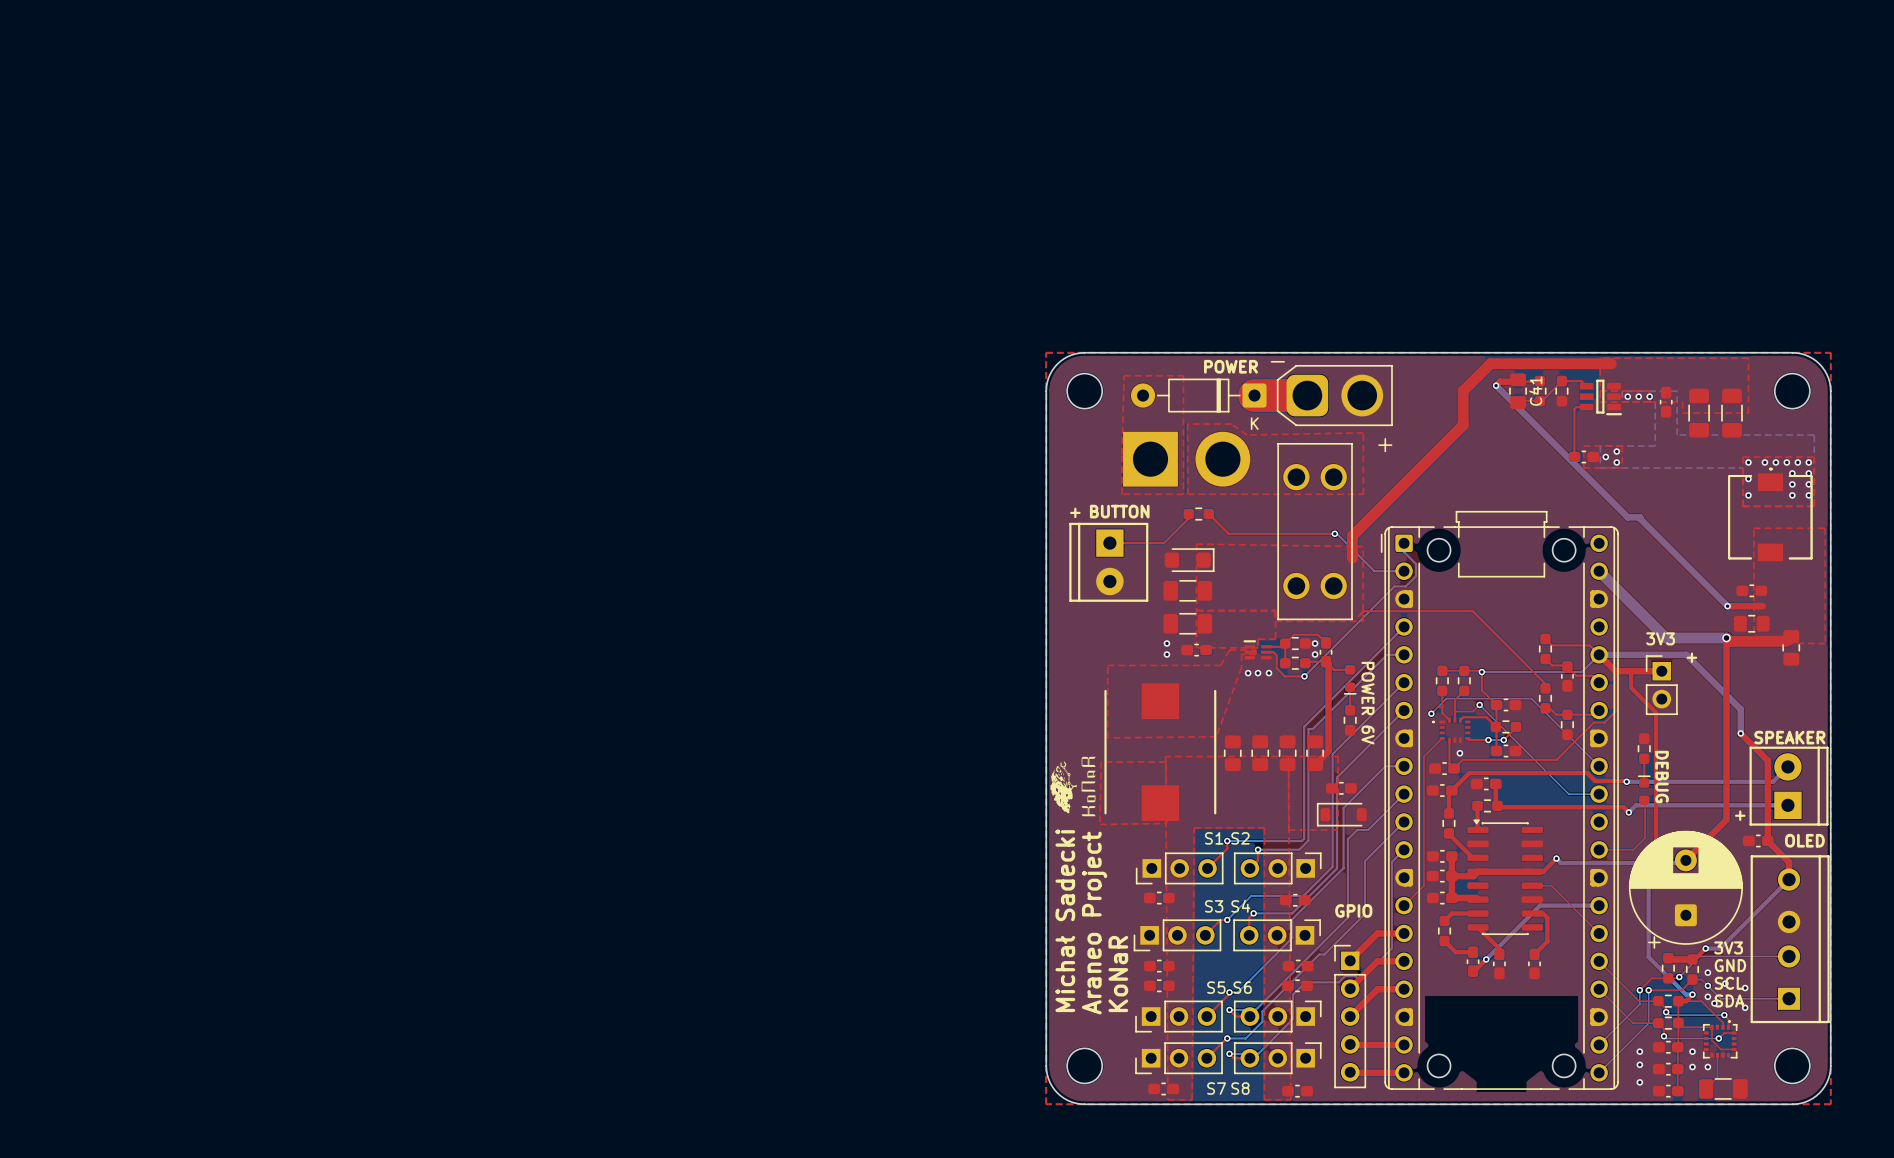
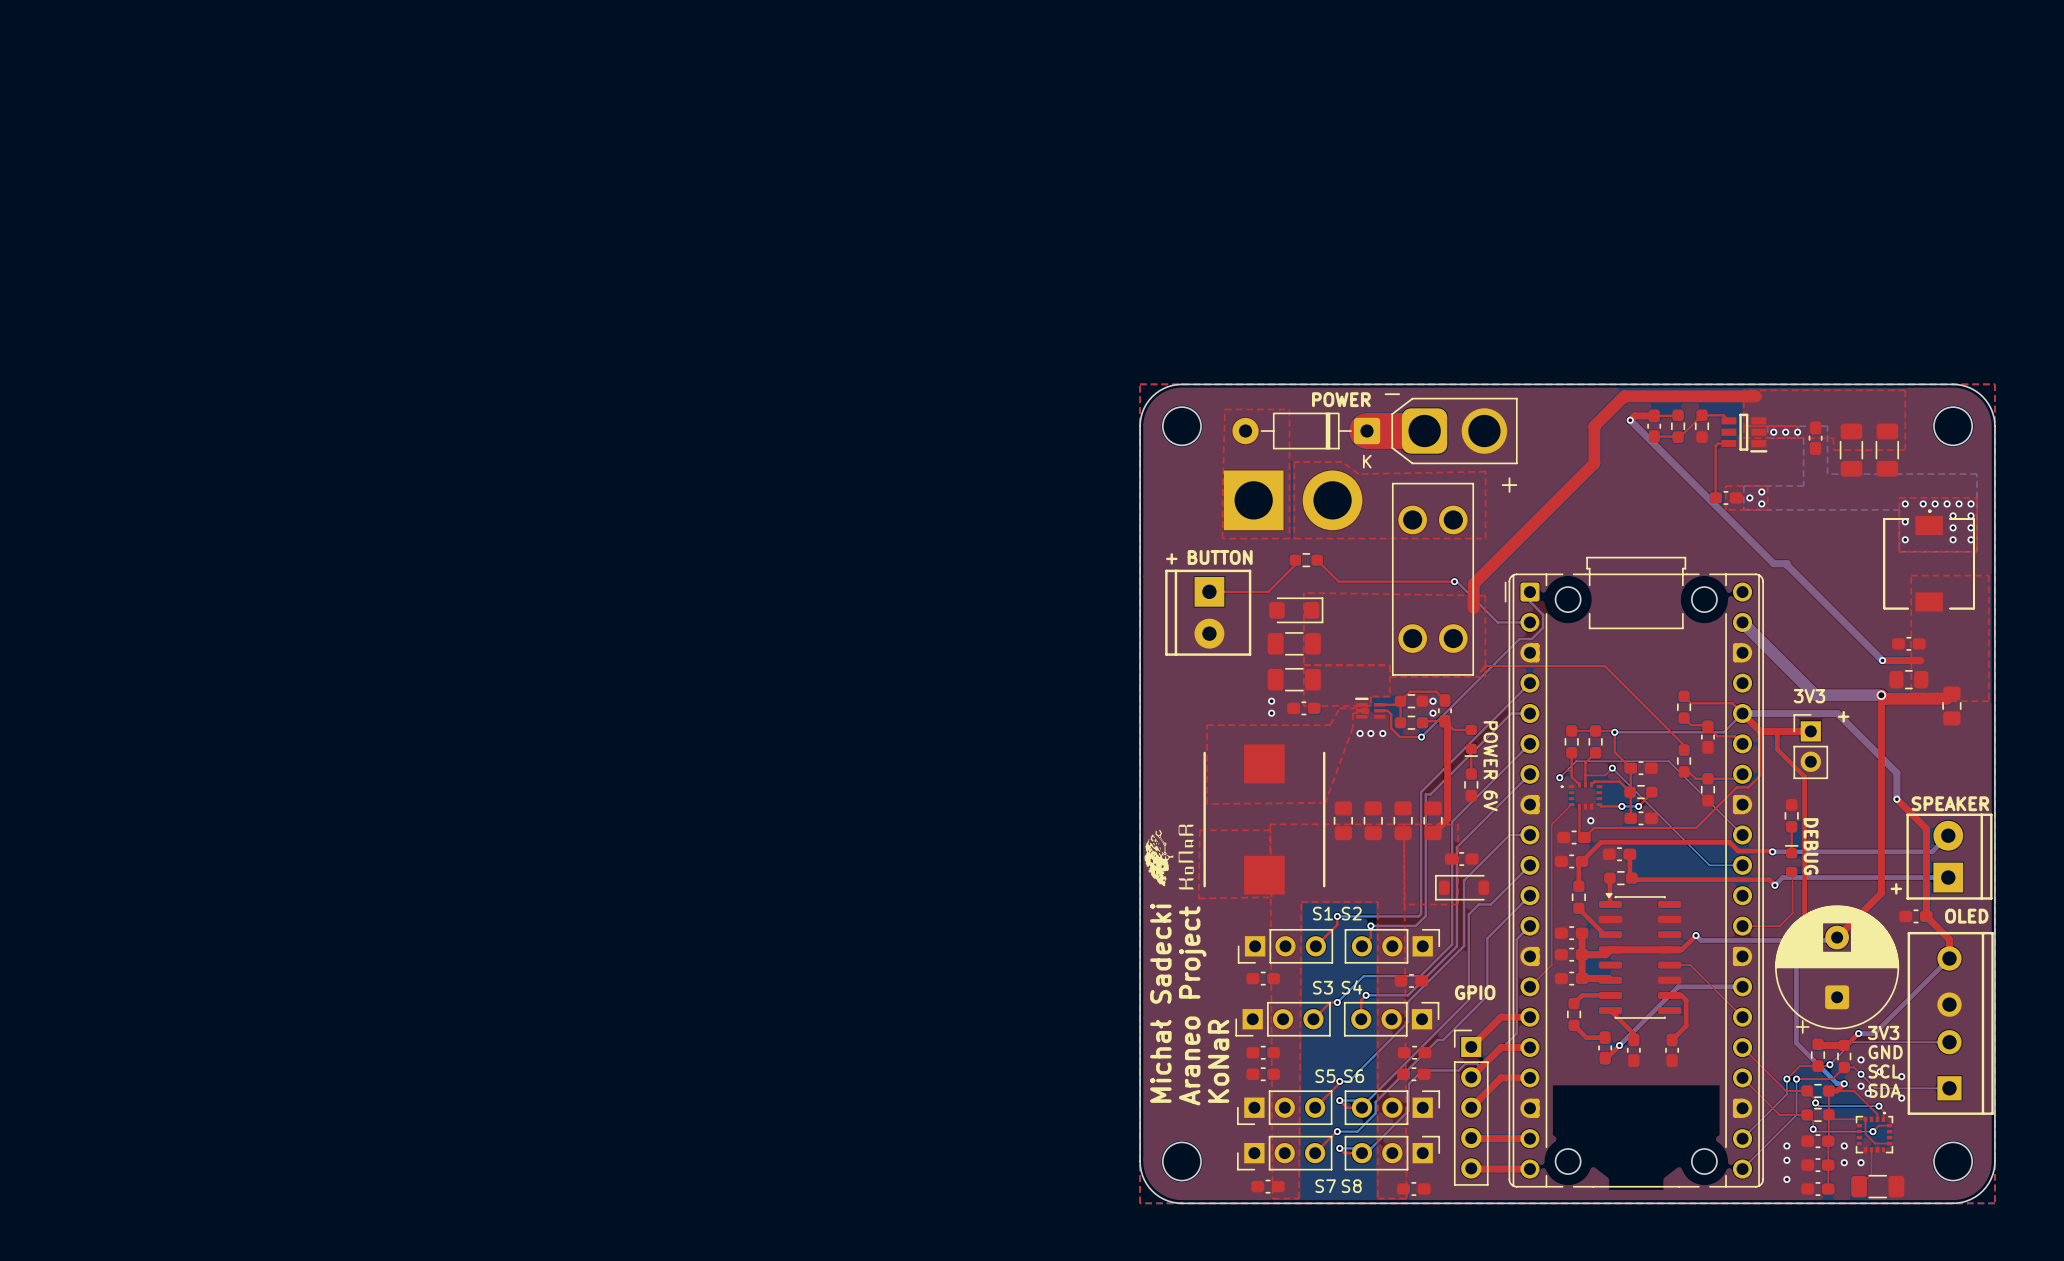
C41: (1518, 391) -> none
part: none -> (1654, 426)

